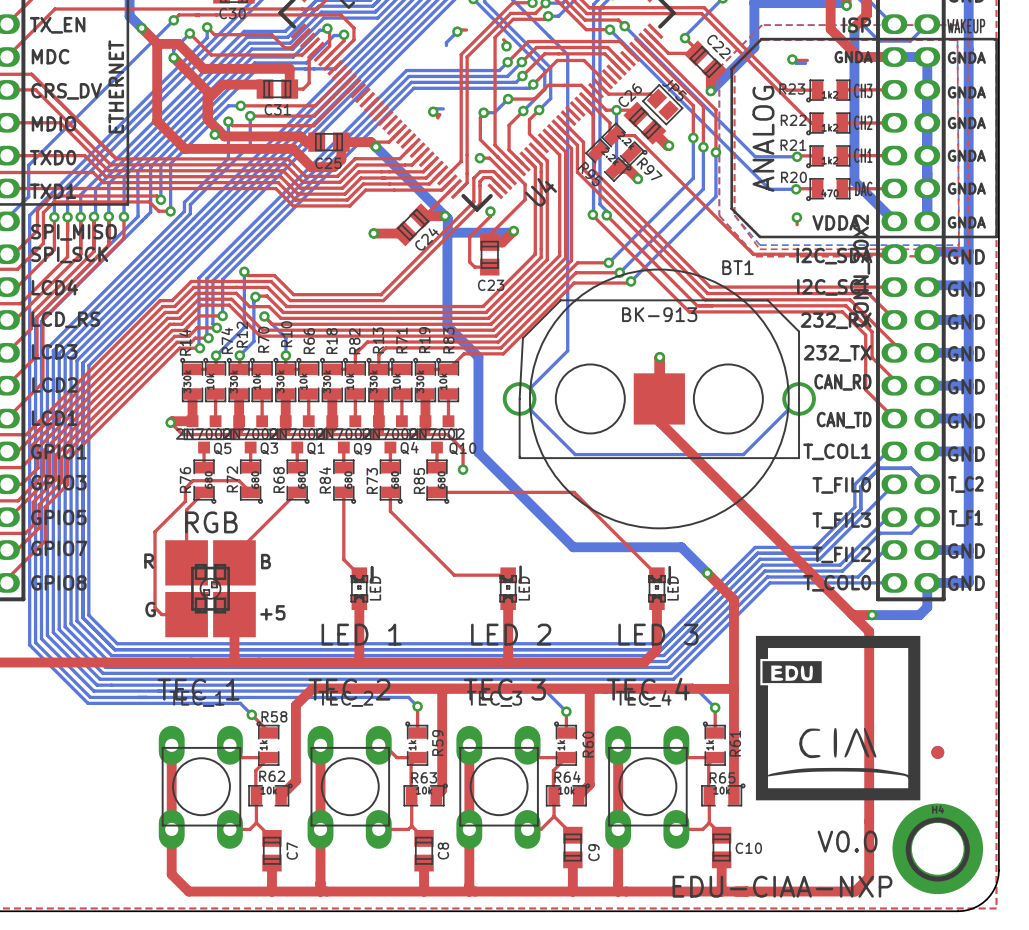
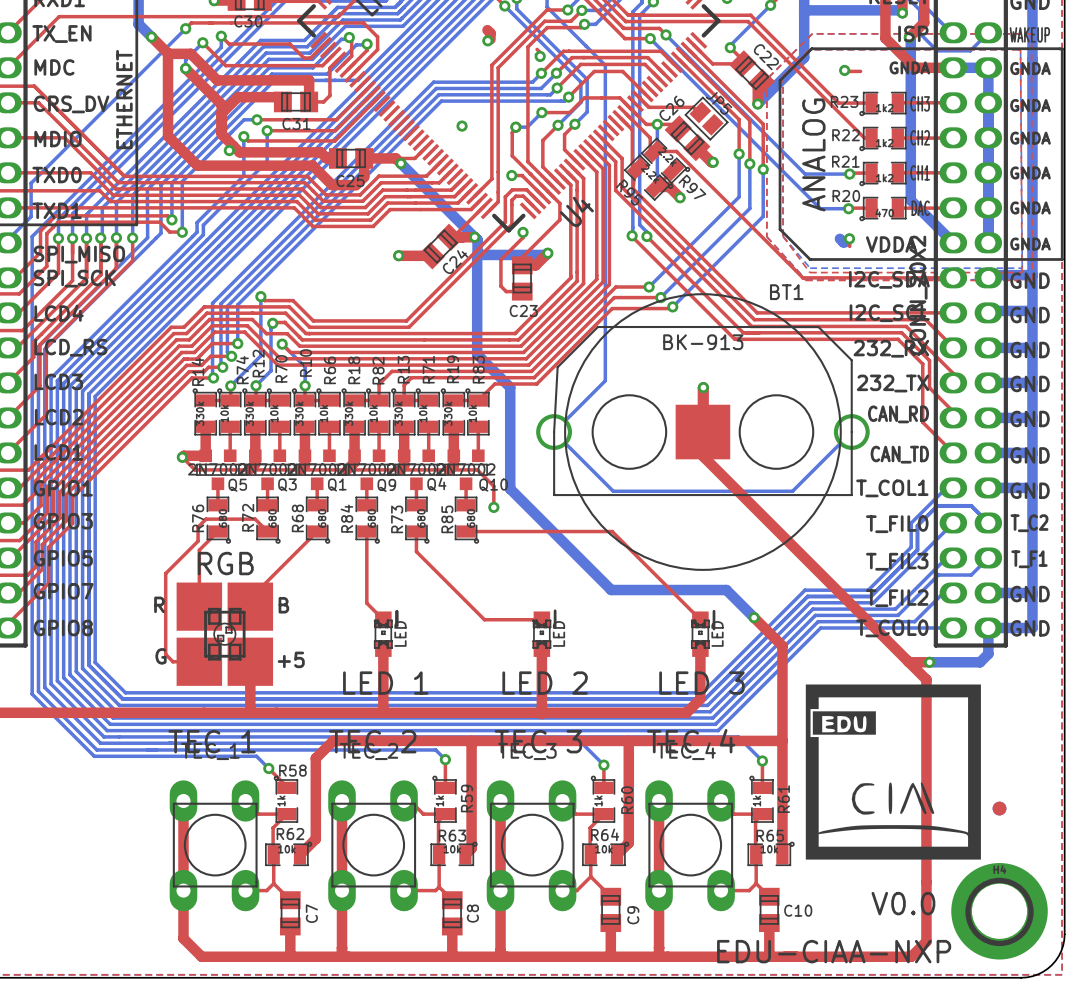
top track: none -> (487, 30) (490, 33) (490, 39)
top track: (466, 30) (457, 31) -> none
bottom track: (457, 31) (446, 42) (446, 45) -> none
bottom track: (792, 59) (796, 63) (805, 63) -> none
bottom track: (443, 108) (436, 108) (433, 111) -> none
top track: (433, 111) (439, 114) (437, 117) -> none
bottom track: none -> (839, 238) (845, 242)

